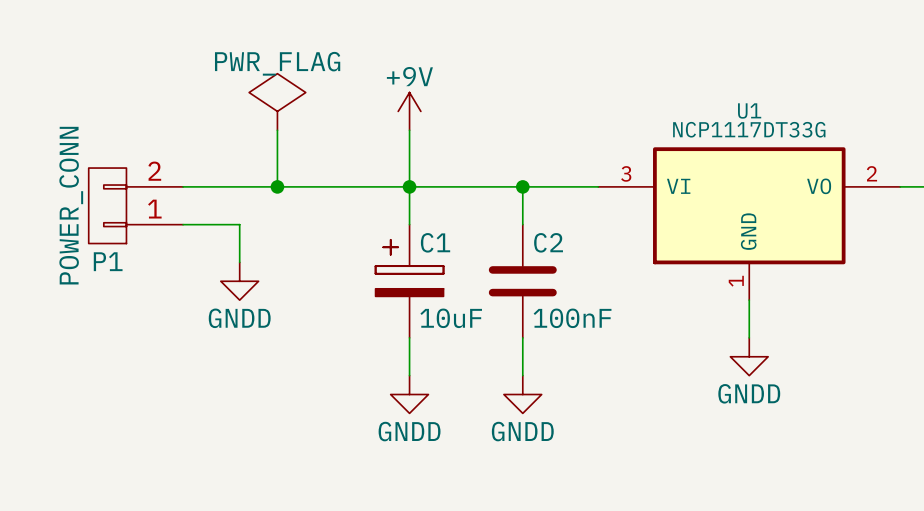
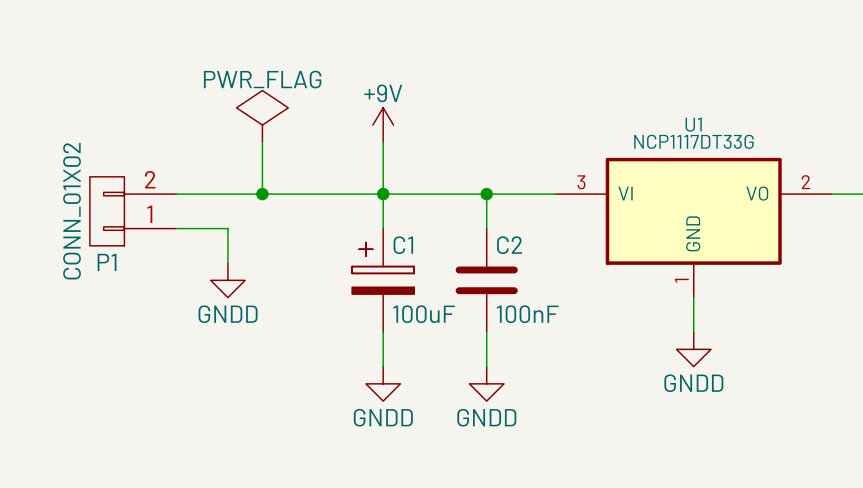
P1 value: POWER_CONN (71, 205) -> CONN_01X02 (72, 211)
C1 value: 10uF (451, 318) -> 100uF (424, 314)

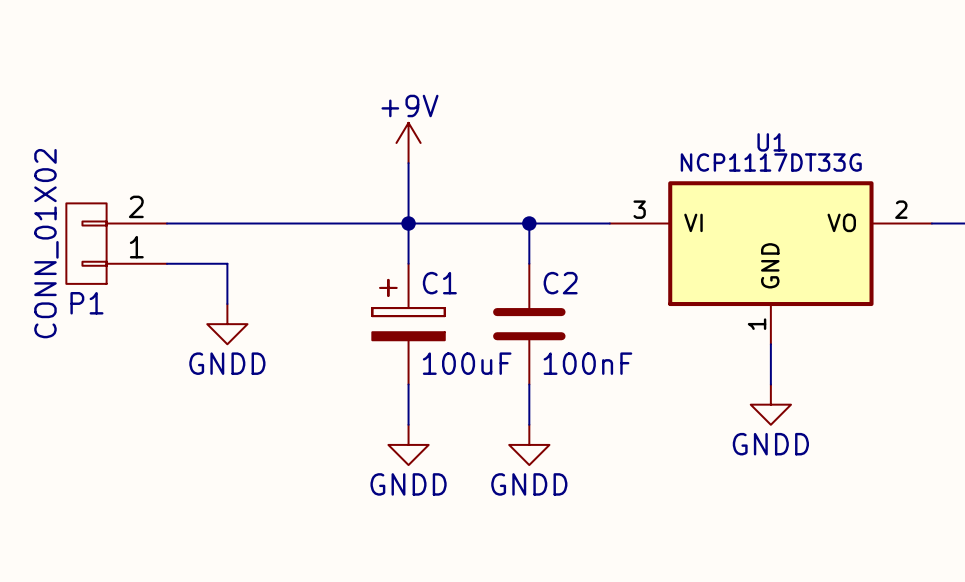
power symbol: PWR_FLAG (262, 116) -> none
wire: (262, 142) (262, 194) -> none
junction: (262, 194) -> none

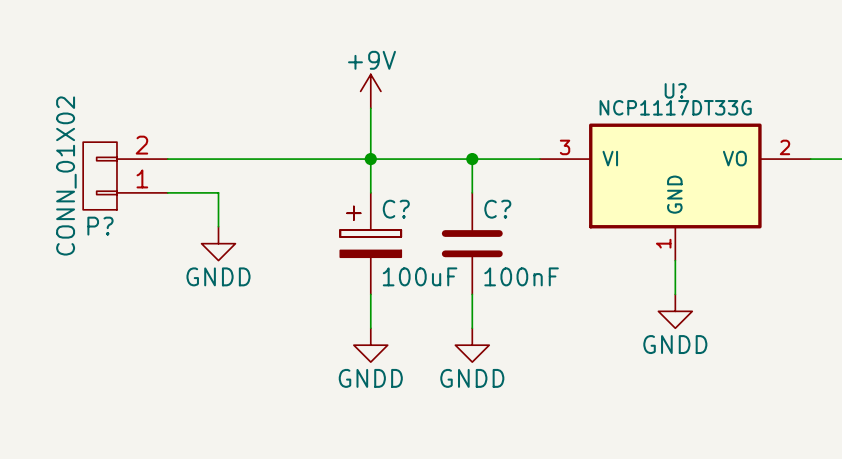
U1 name: U1 (771, 142) -> U? (675, 90)
C1 name: C1 (439, 283) -> C? (396, 209)
C2 name: C2 (560, 283) -> C? (497, 209)
P1 name: P1 (86, 303) -> P? (100, 226)

